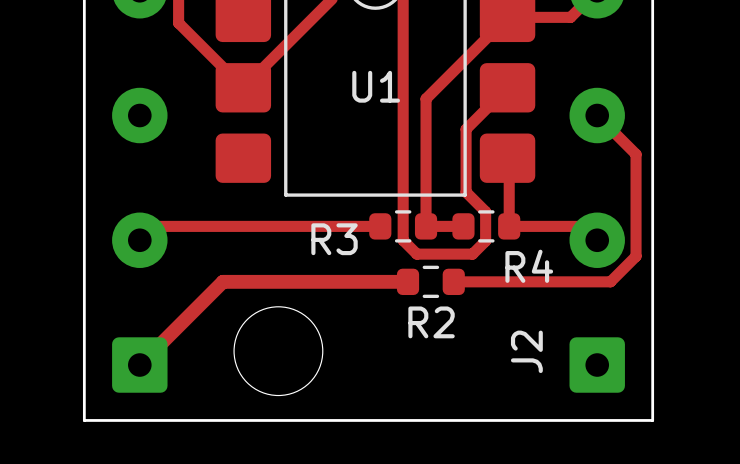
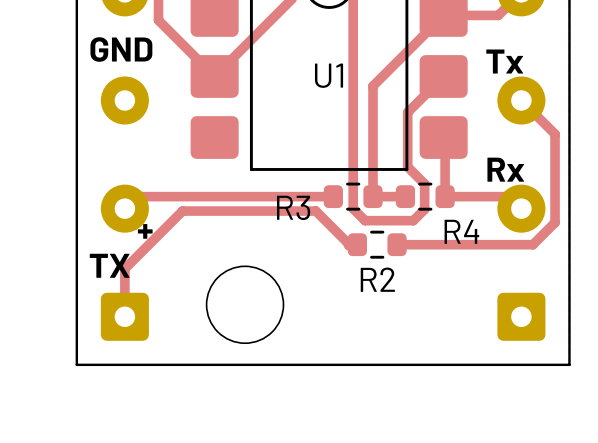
text: none -> GND (121, 49)
text: none -> Tx (504, 61)
text: none -> Rx (505, 169)
text: none -> + (145, 231)
track: (398, 281) (222, 281) (139, 365) -> (349, 244) (315, 211) (182, 211) (124, 268) (124, 316)
text: none -> TX (109, 265)
J2 name: J2 (526, 351) -> none

